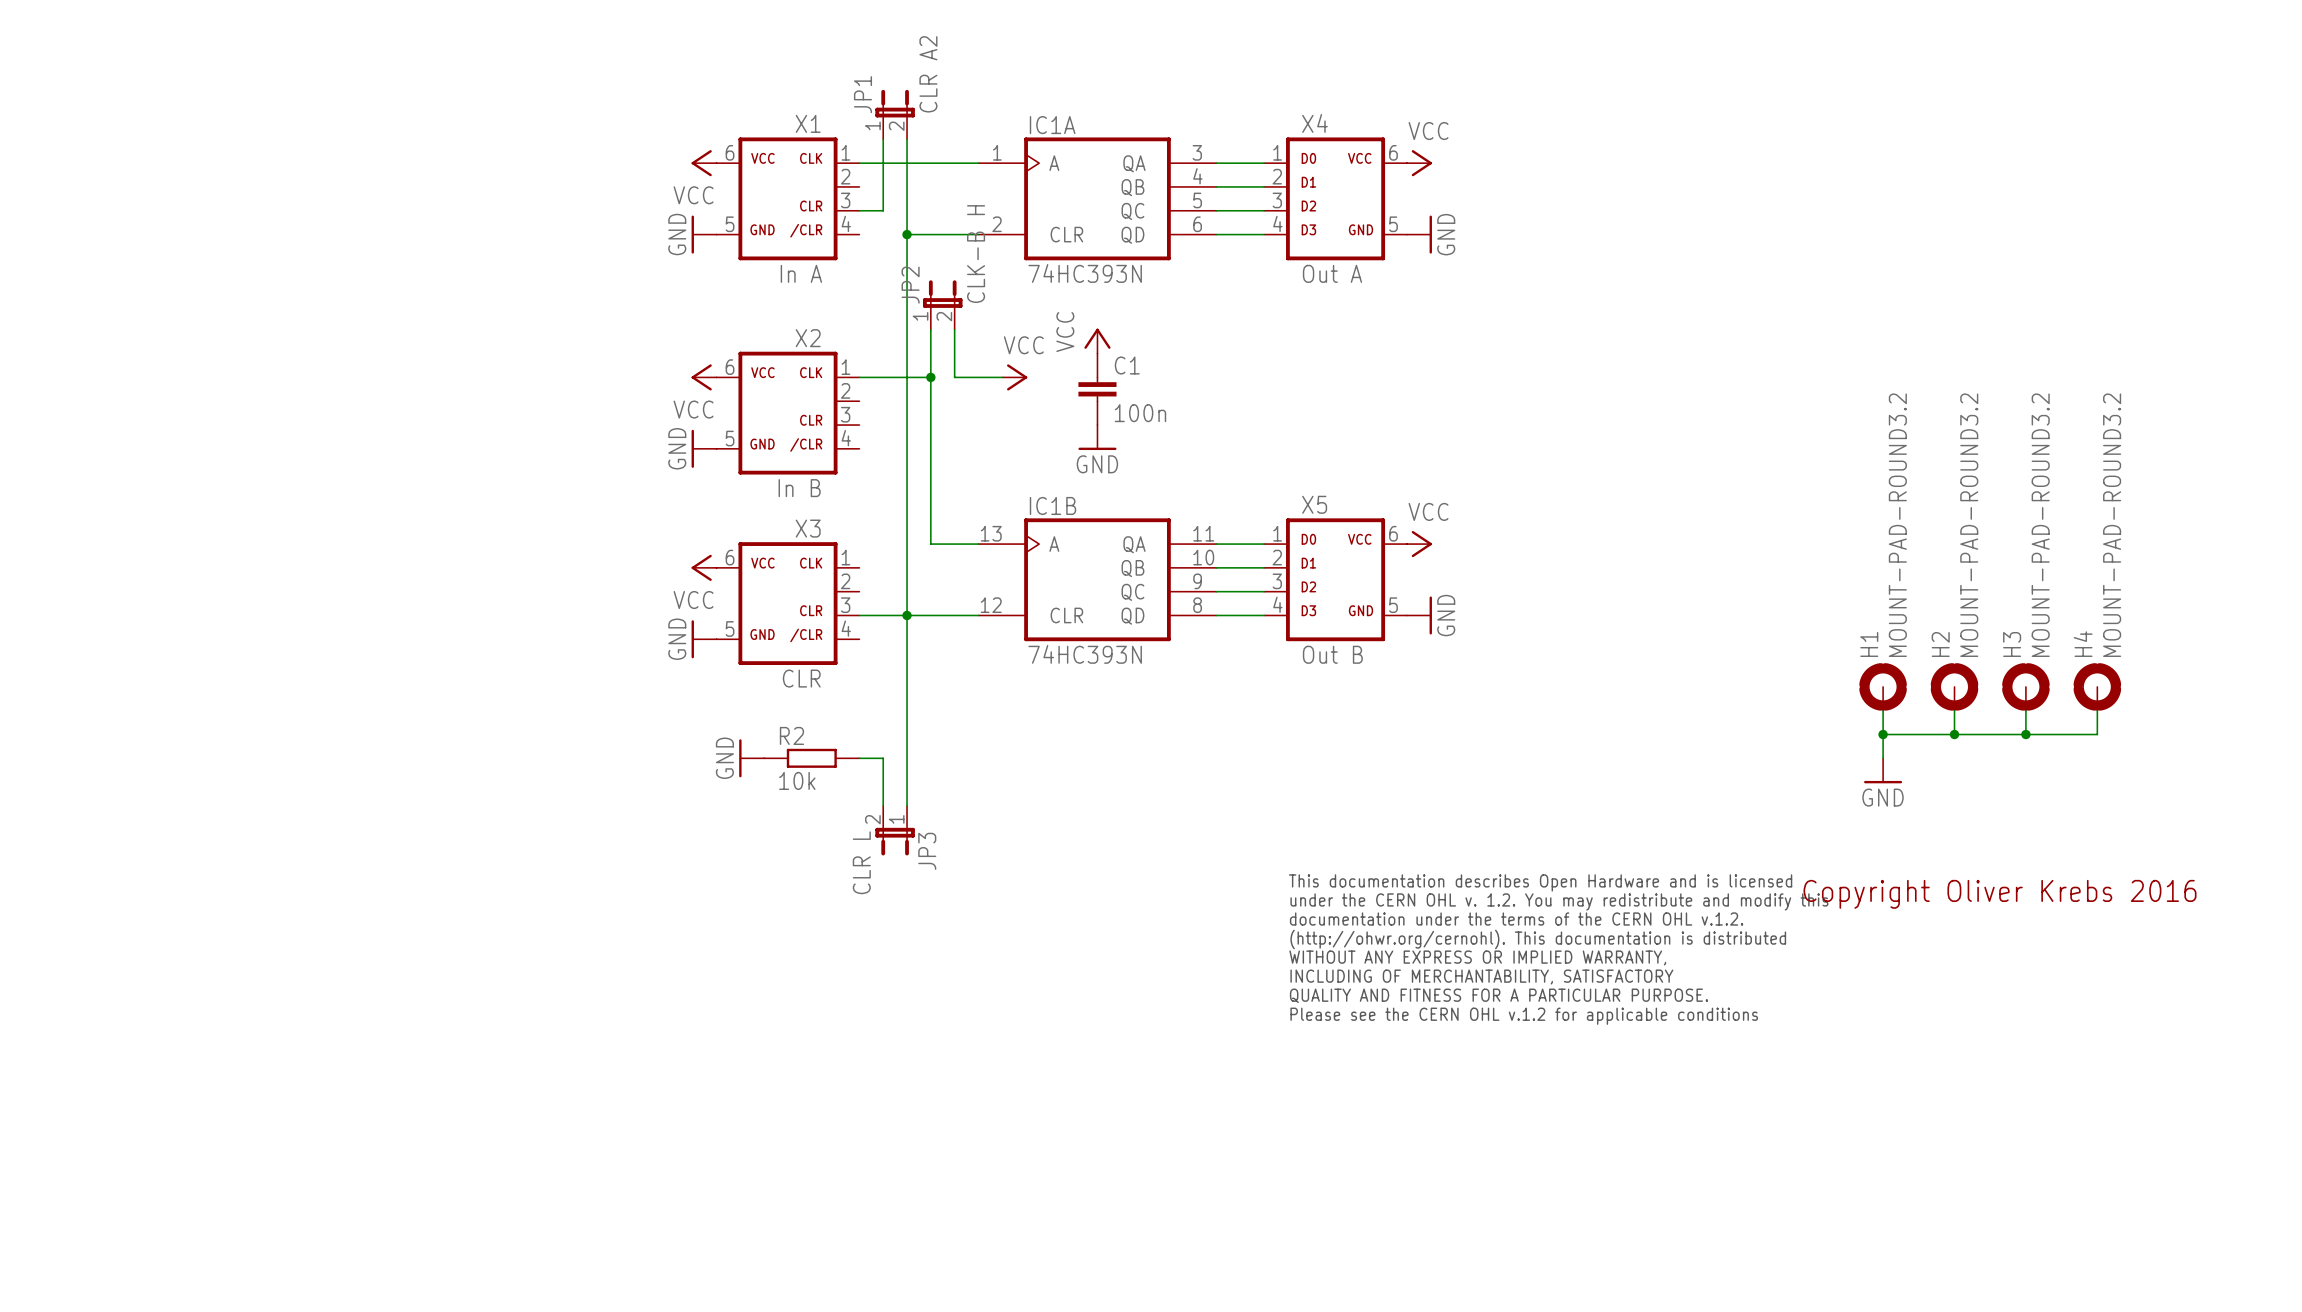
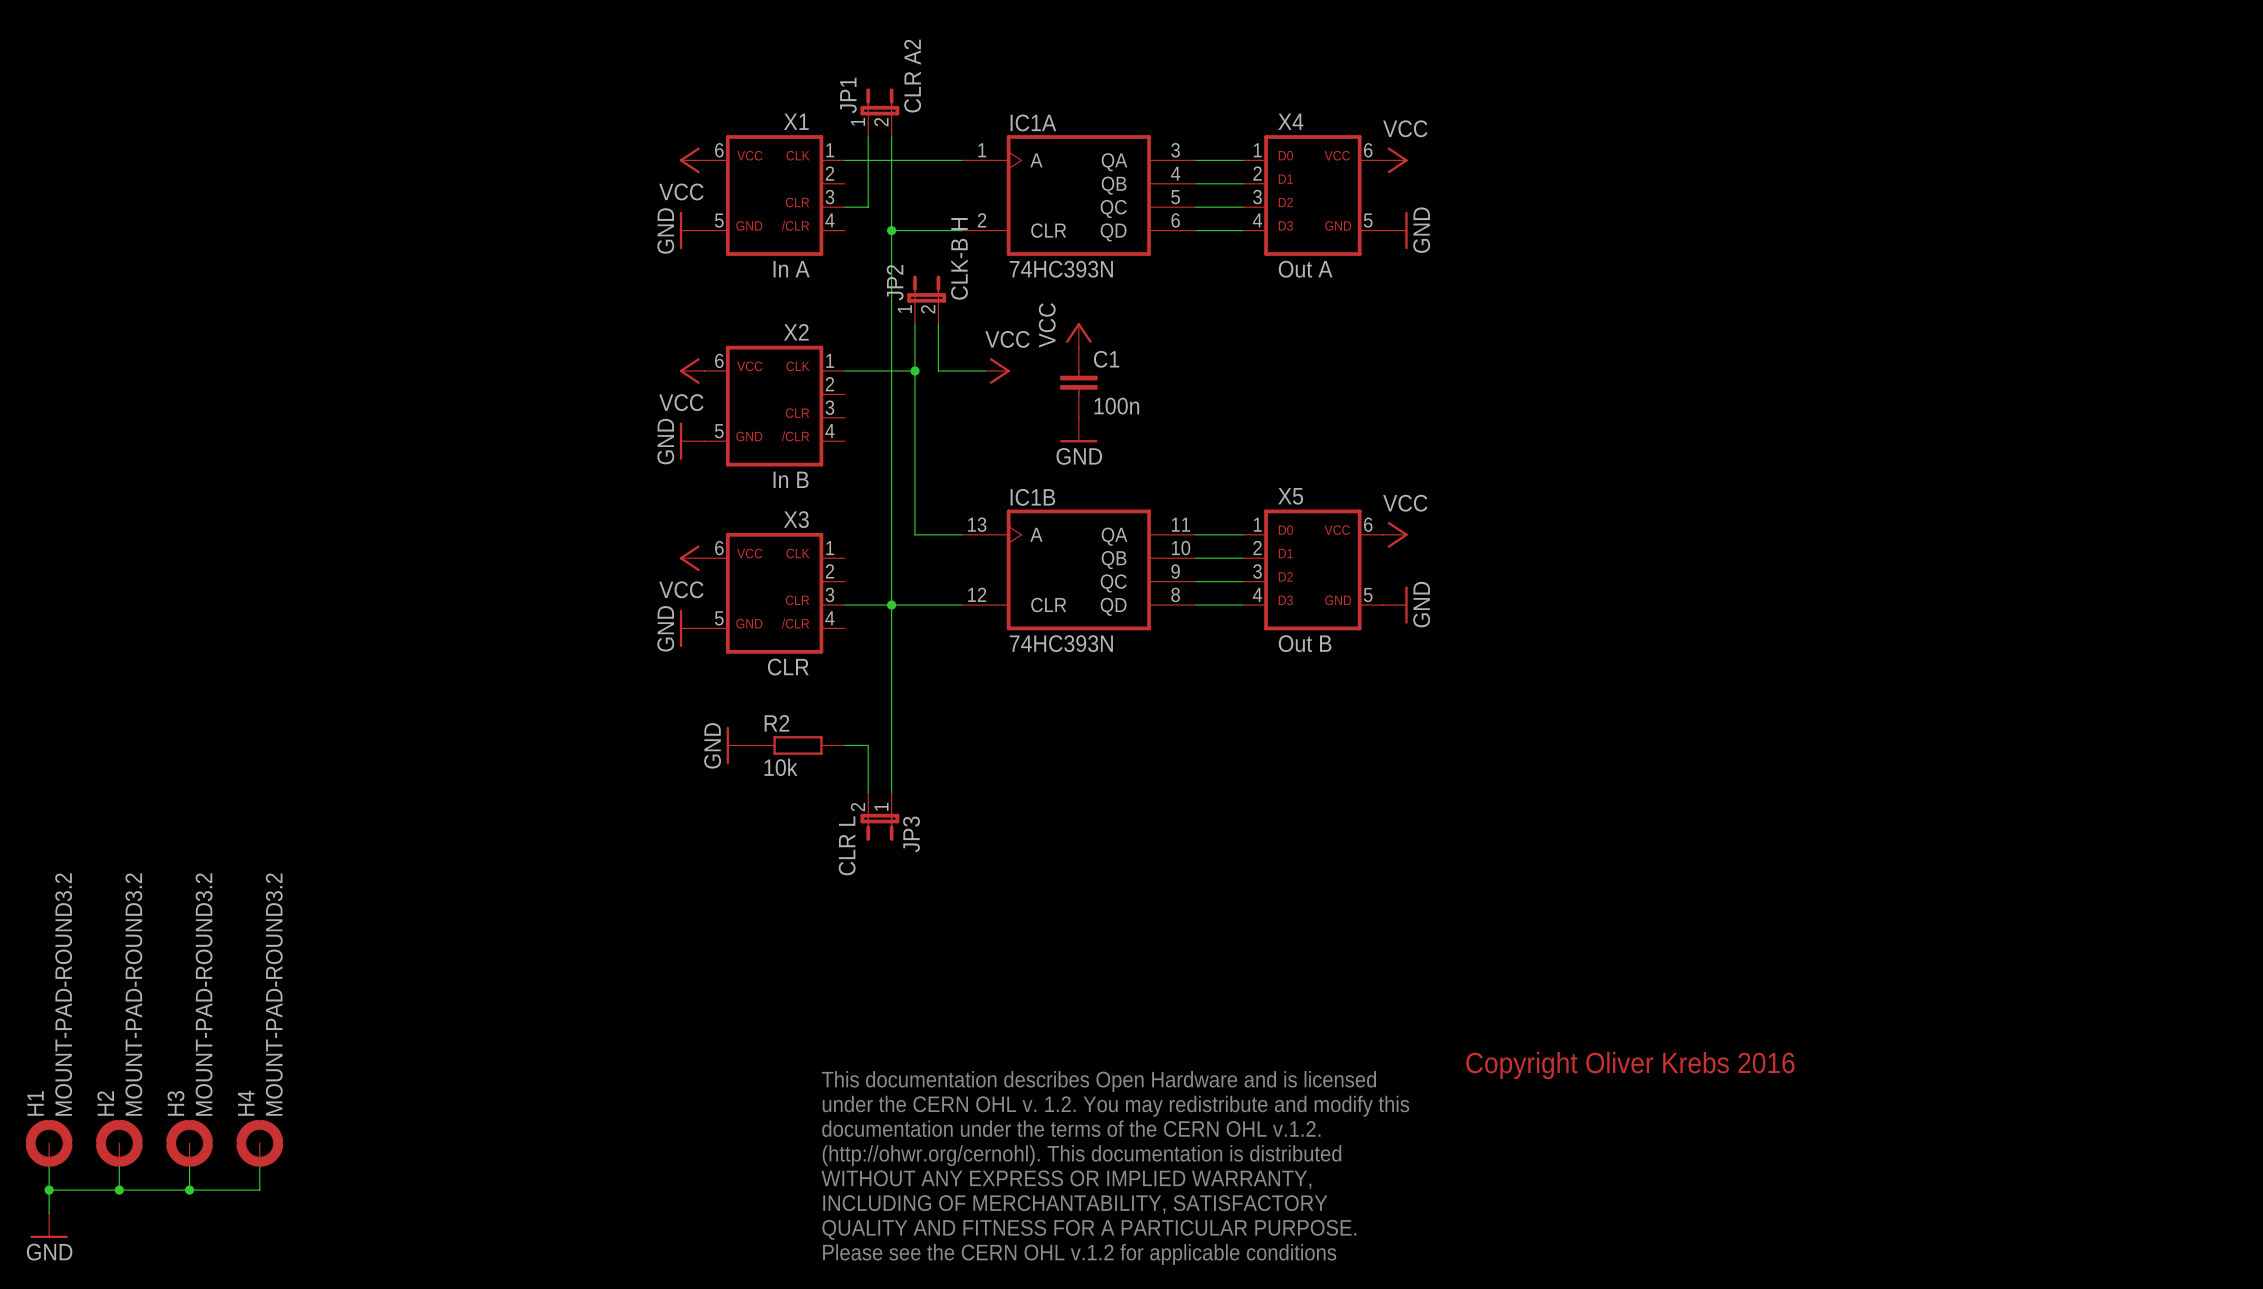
H1 position: (1883, 686) -> (49, 1143)
H2 position: (1954, 686) -> (119, 1143)
H3 position: (2025, 686) -> (189, 1143)
H4 position: (2097, 686) -> (259, 1143)
wire: (1883, 710) (1883, 758) -> none
wire: (1954, 710) (1954, 734) -> none
wire: (2025, 710) (2025, 734) -> none
wire: (2097, 710) (2097, 734) (1883, 734) -> none
junction: (1883, 734) -> none
junction: (1954, 734) -> none
junction: (2025, 734) -> none
power symbol: GND (1883, 770) -> none
text: This documentation describes Open Hardware and is licensed (1540, 882) -> none
text: Copyright Oliver Krebs 2016 (2000, 894) -> none
text: under the CERN OHL v. 1.2. You may redistribute and modify this (1559, 901) -> none
text: documentation under the terms of the CERN OHL v.1.2. (1516, 919) -> none
text: (http://ohwr.org/cernohl). This documentation is distributed (1538, 939) -> none
text: WITHOUT ANY EXPRESS OR IMPLIED WARRANTY, (1477, 957) -> none
text: INCLUDING OF MERCHANTABILITY, SATISFACTORY (1481, 977) -> none
text: QUALITY AND FITNESS FOR A PARTICULAR PURPOSE. (1498, 995) -> none
text: Please see the CERN OHL v.1.2 for applicable conditions (1524, 1016) -> none
text: none -> Copyright Oliver Krebs 2016 (1630, 1065)
text: none -> This documentation describes Open Hardware and is licensed (1098, 1081)
text: none -> under the CERN OHL v. 1.2. You may redistribute and modify this (1115, 1106)
text: none -> documentation under the terms of the CERN OHL v.1.2. (1071, 1128)
text: none -> (http://ohwr.org/cernohl). This documentation is distributed (1081, 1155)
wire: none -> (49, 1166) (49, 1213)
wire: none -> (119, 1166) (119, 1190)
wire: none -> (189, 1166) (189, 1190)
wire: none -> (259, 1166) (259, 1190) (49, 1190)
text: none -> WITHOUT ANY EXPRESS OR IMPLIED WARRANTY, (1066, 1179)
junction: none -> (49, 1190)
junction: none -> (119, 1190)
junction: none -> (189, 1190)
text: none -> INCLUDING OF MERCHANTABILITY, SATISFACTORY (1075, 1204)
power symbol: none -> GND (49, 1225)
text: none -> QUALITY AND FITNESS FOR A PARTICULAR PURPOSE. (1089, 1229)
text: none -> Please see the CERN OHL v.1.2 for applicable conditions (1079, 1254)

